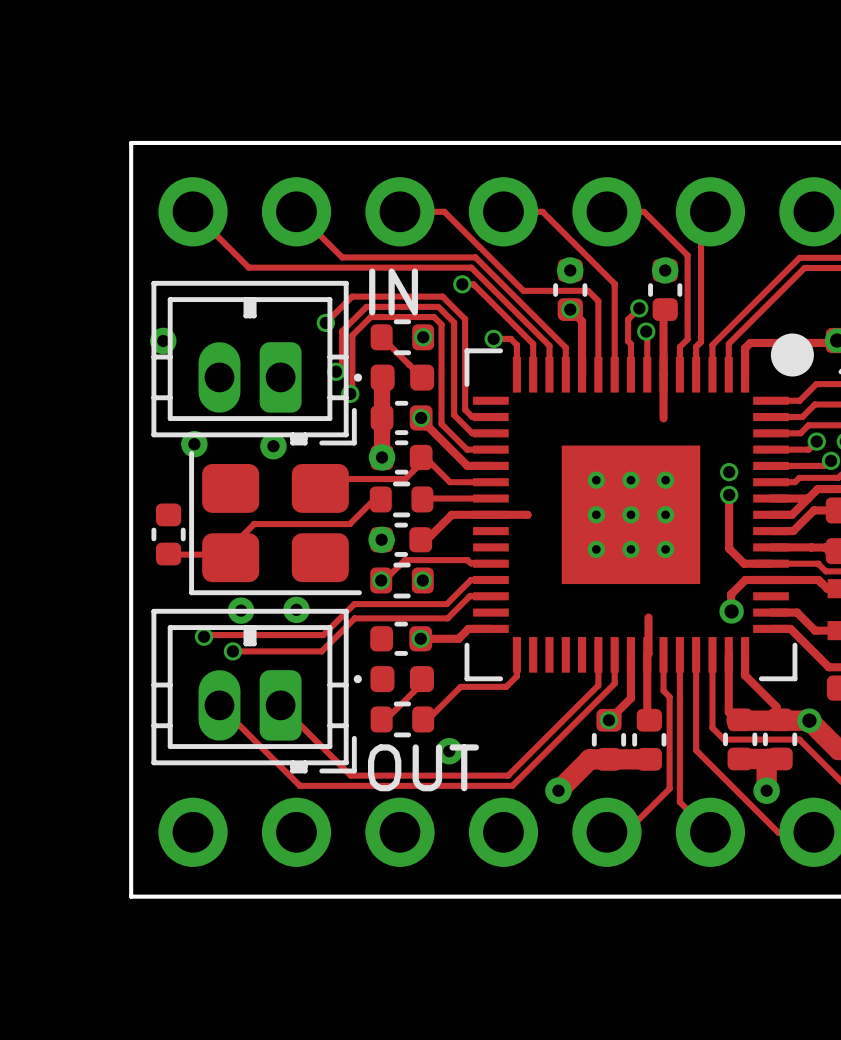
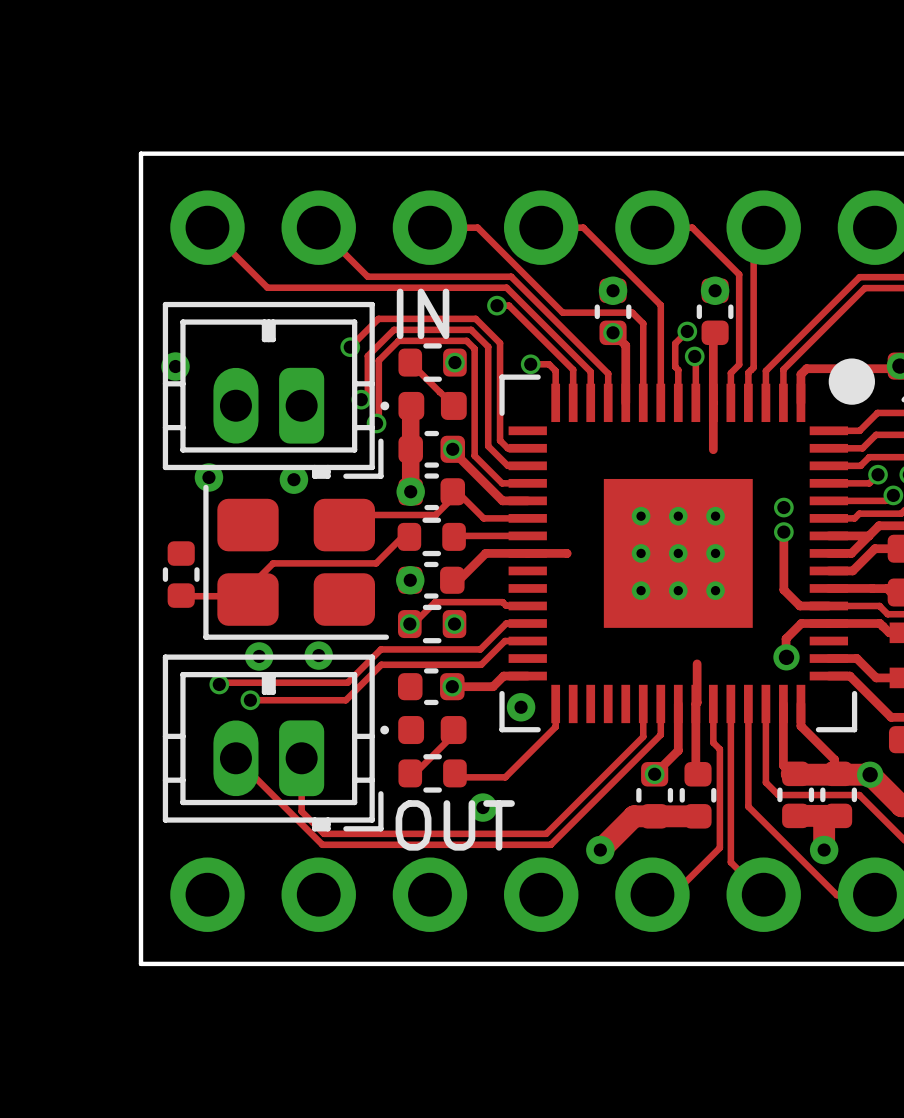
via: none -> (521, 707)
track: (506, 686) (460, 686) (426, 721) -> (544, 738) (505, 777) (459, 777) (458, 775)
track: (280, 705) (350, 775) -> (301, 758) (301, 811) (323, 833) (377, 833)

